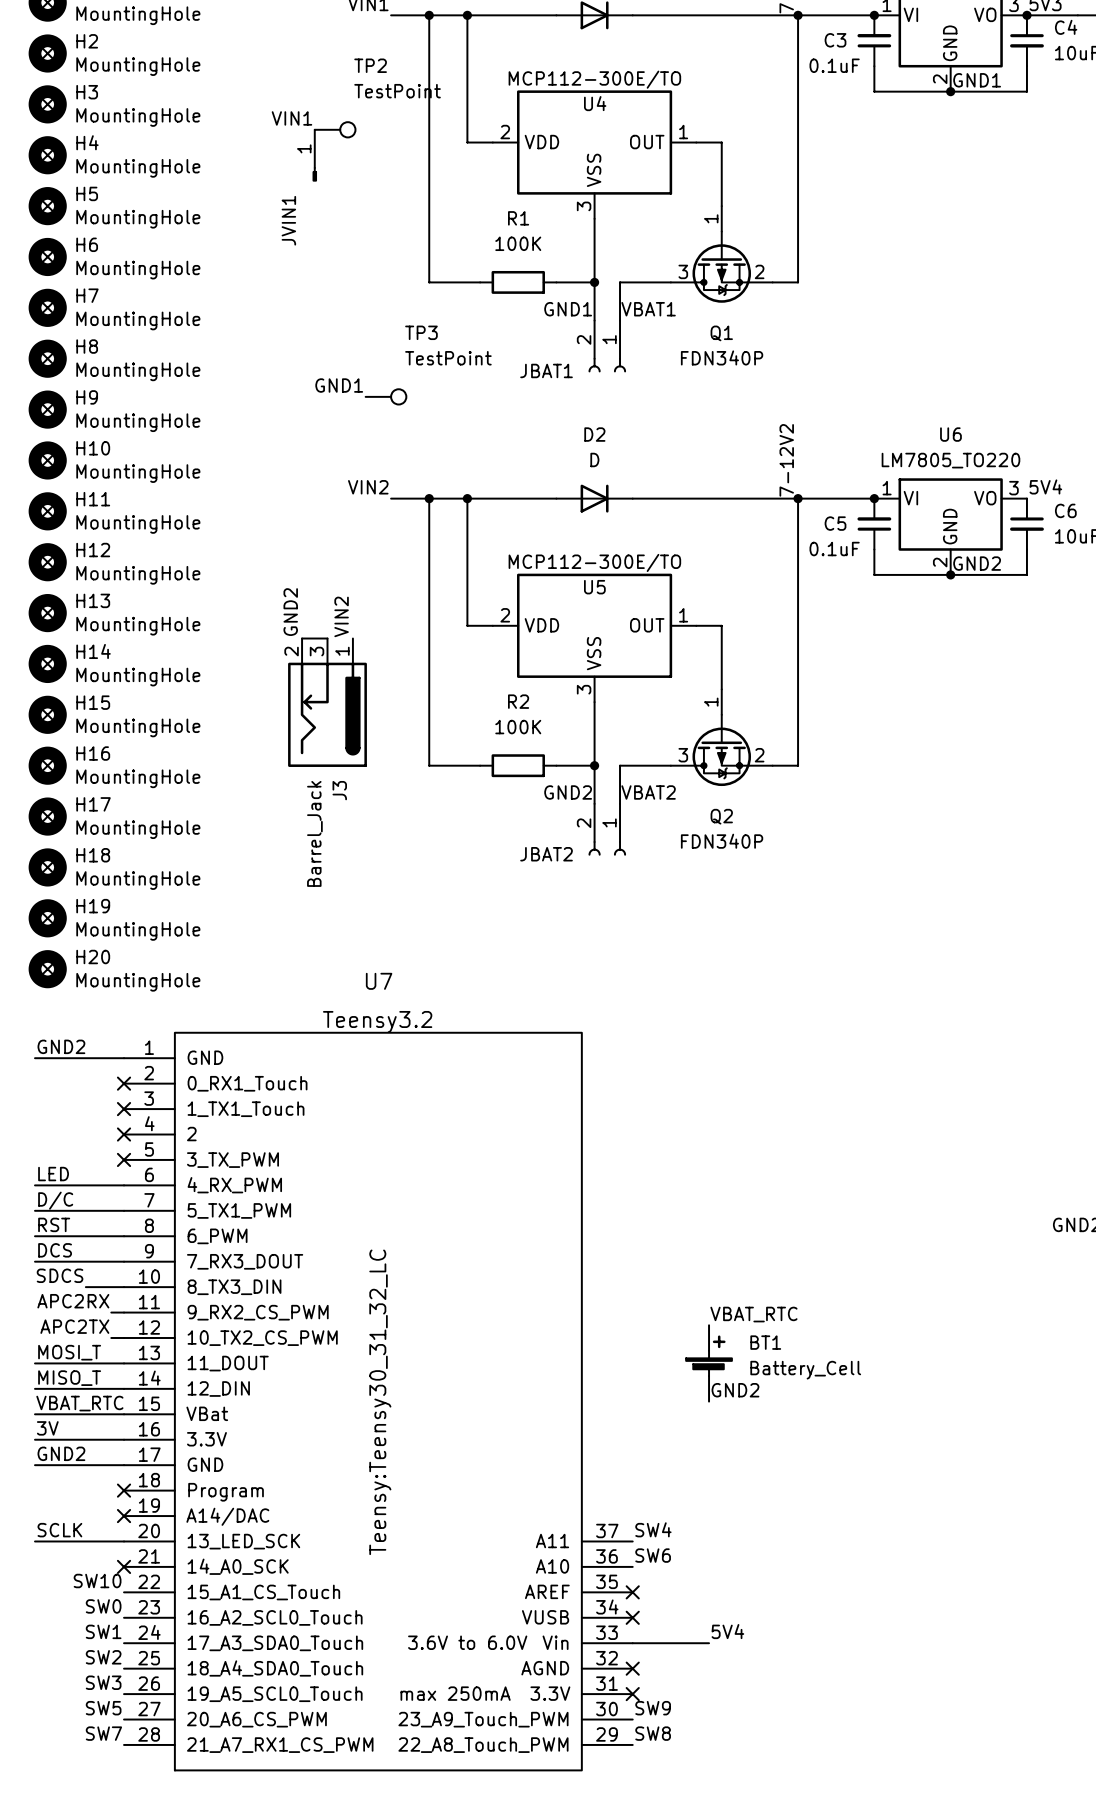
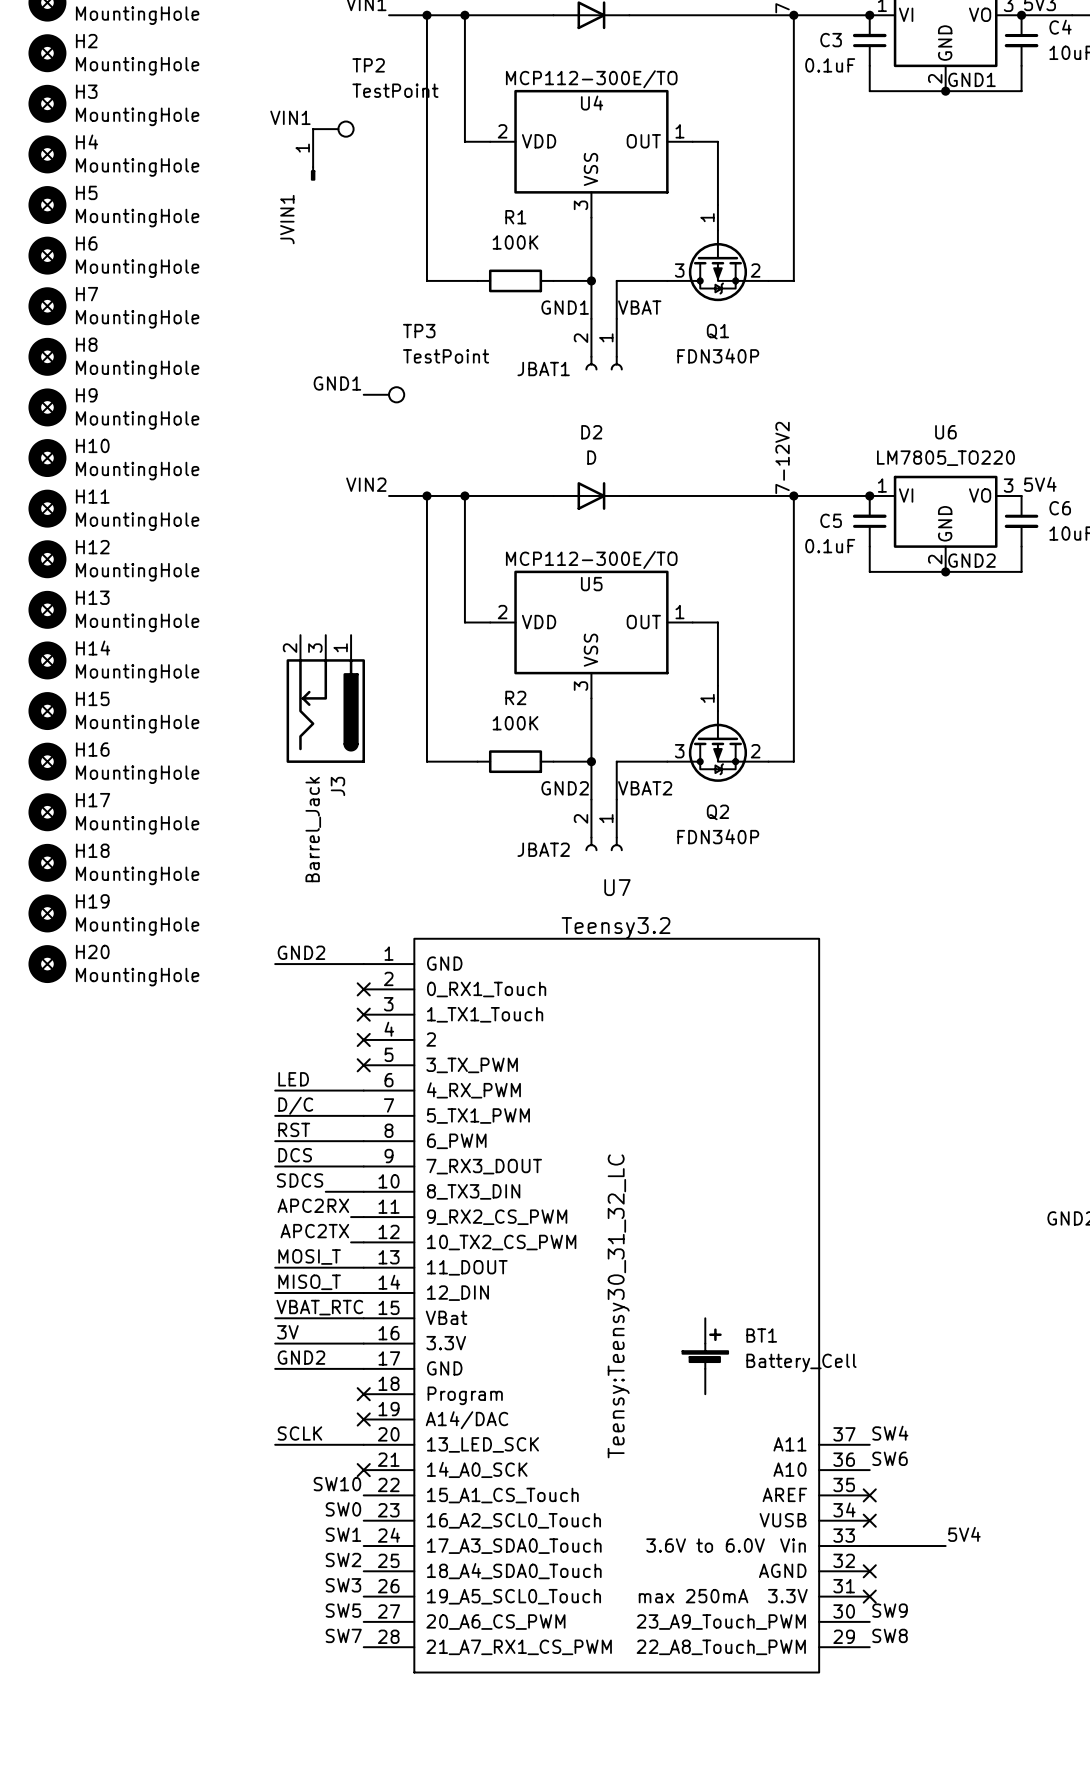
label: VBAT1 (648, 309) -> VBAT (639, 307)
label: GND2 (290, 612) -> none
label: VIN2 (341, 616) -> none
wire: (302, 638) (327, 638) -> none
label: none -> GND2 (301, 952)
wire: none -> (275, 964) (363, 964)
no-connect mark: none -> (363, 989)
no-connect mark: none -> (363, 1014)
no-connect mark: none -> (363, 1039)
label: GND2 (61, 1046) -> none
wire: (34, 1058) (124, 1058) -> (275, 1090) (363, 1090)
no-connect mark: none -> (363, 1065)
no-connect mark: (124, 1083) -> none
label: none -> LED (293, 1079)
no-connect mark: (124, 1109) -> none
label: none -> D/C (295, 1105)
no-connect mark: (124, 1134) -> none
label: none -> RST (294, 1129)
no-connect mark: (124, 1159) -> none
label: none -> DCS (295, 1155)
label: LED (53, 1174) -> none
wire: (34, 1185) (124, 1185) -> (275, 1115) (363, 1115)
label: none -> SDCS (300, 1180)
wire: none -> (325, 1191) (363, 1191)
label: D/C (55, 1200) -> none
wire: (34, 1210) (124, 1210) -> (275, 1141) (363, 1141)
label: none -> APC2RX (313, 1205)
wire: none -> (351, 1217) (363, 1217)
label: RST (54, 1224) -> none
wire: (34, 1236) (124, 1236) -> (275, 1166) (363, 1166)
label: none -> APC2TX (314, 1231)
label: DCS (55, 1250) -> none
wire: (34, 1261) (124, 1261) -> (275, 1267) (363, 1267)
label: none -> MOSI_T (309, 1257)
label: SDCS (60, 1275) -> none
wire: (85, 1287) (124, 1287) -> none
label: none -> MISO_T (309, 1282)
label: APC2RX (73, 1301) -> none
wire: (111, 1312) (124, 1312) -> (351, 1242) (363, 1242)
label: none -> VBAT_RTC (319, 1307)
label: VBAT_RTC (753, 1314) -> none
label: APC2TX (74, 1326) -> none
wire: (111, 1337) (124, 1337) -> none
label: none -> 3V (287, 1332)
label: MOSI_T (69, 1352) -> none
wire: (34, 1363) (124, 1363) -> (275, 1292) (363, 1292)
label: none -> GND2 (301, 1357)
label: MISO_T (69, 1378) -> none
wire: (34, 1388) (124, 1388) -> (275, 1318) (363, 1318)
label: GND2 (735, 1390) -> none
no-connect mark: none -> (363, 1394)
U7 position: (378, 1401) -> (616, 1305)
label: VBAT_RTC (79, 1403) -> none
wire: (34, 1414) (124, 1414) -> (275, 1343) (363, 1343)
no-connect mark: none -> (363, 1419)
label: 3V (47, 1428) -> none
wire: (34, 1439) (124, 1439) -> (275, 1368) (363, 1368)
label: none -> SW4 (890, 1433)
label: none -> SCLK (299, 1433)
label: GND2 (61, 1453) -> none
wire: (34, 1465) (124, 1465) -> (275, 1444) (363, 1444)
label: none -> SW6 (890, 1458)
no-connect mark: none -> (363, 1470)
no-connect mark: (124, 1490) -> none
label: none -> SW10 (337, 1484)
no-connect mark: none -> (869, 1495)
no-connect mark: (124, 1516) -> none
label: none -> SW0 (343, 1509)
no-connect mark: none -> (869, 1520)
label: SW4 (653, 1529) -> none
label: SCLK (59, 1530) -> none
wire: (34, 1541) (124, 1541) -> none
label: none -> SW1 (343, 1534)
label: none -> 5V4 (964, 1534)
wire: none -> (869, 1546) (945, 1546)
label: SW6 (653, 1555) -> none
no-connect mark: (124, 1566) -> none
label: none -> SW2 (343, 1560)
no-connect mark: none -> (869, 1571)
label: SW10 (97, 1581) -> none
no-connect mark: (632, 1592) -> none
label: none -> SW3 (343, 1585)
no-connect mark: none -> (869, 1596)
label: SW0 (103, 1606) -> none
no-connect mark: (632, 1617) -> none
label: none -> SW5 (343, 1610)
label: none -> SW9 (890, 1610)
label: SW1 (103, 1631) -> none
label: 5V4 (727, 1631) -> none
wire: (632, 1643) (709, 1643) -> none
label: none -> SW7 (343, 1635)
label: none -> SW8 (890, 1635)
label: SW2 (103, 1657) -> none
no-connect mark: (632, 1668) -> none
label: SW3 (103, 1682) -> none
no-connect mark: (632, 1694) -> none
label: SW5 (103, 1708) -> none
label: SW9 (653, 1708) -> none
label: SW7 (103, 1733) -> none
label: SW8 (653, 1733) -> none

